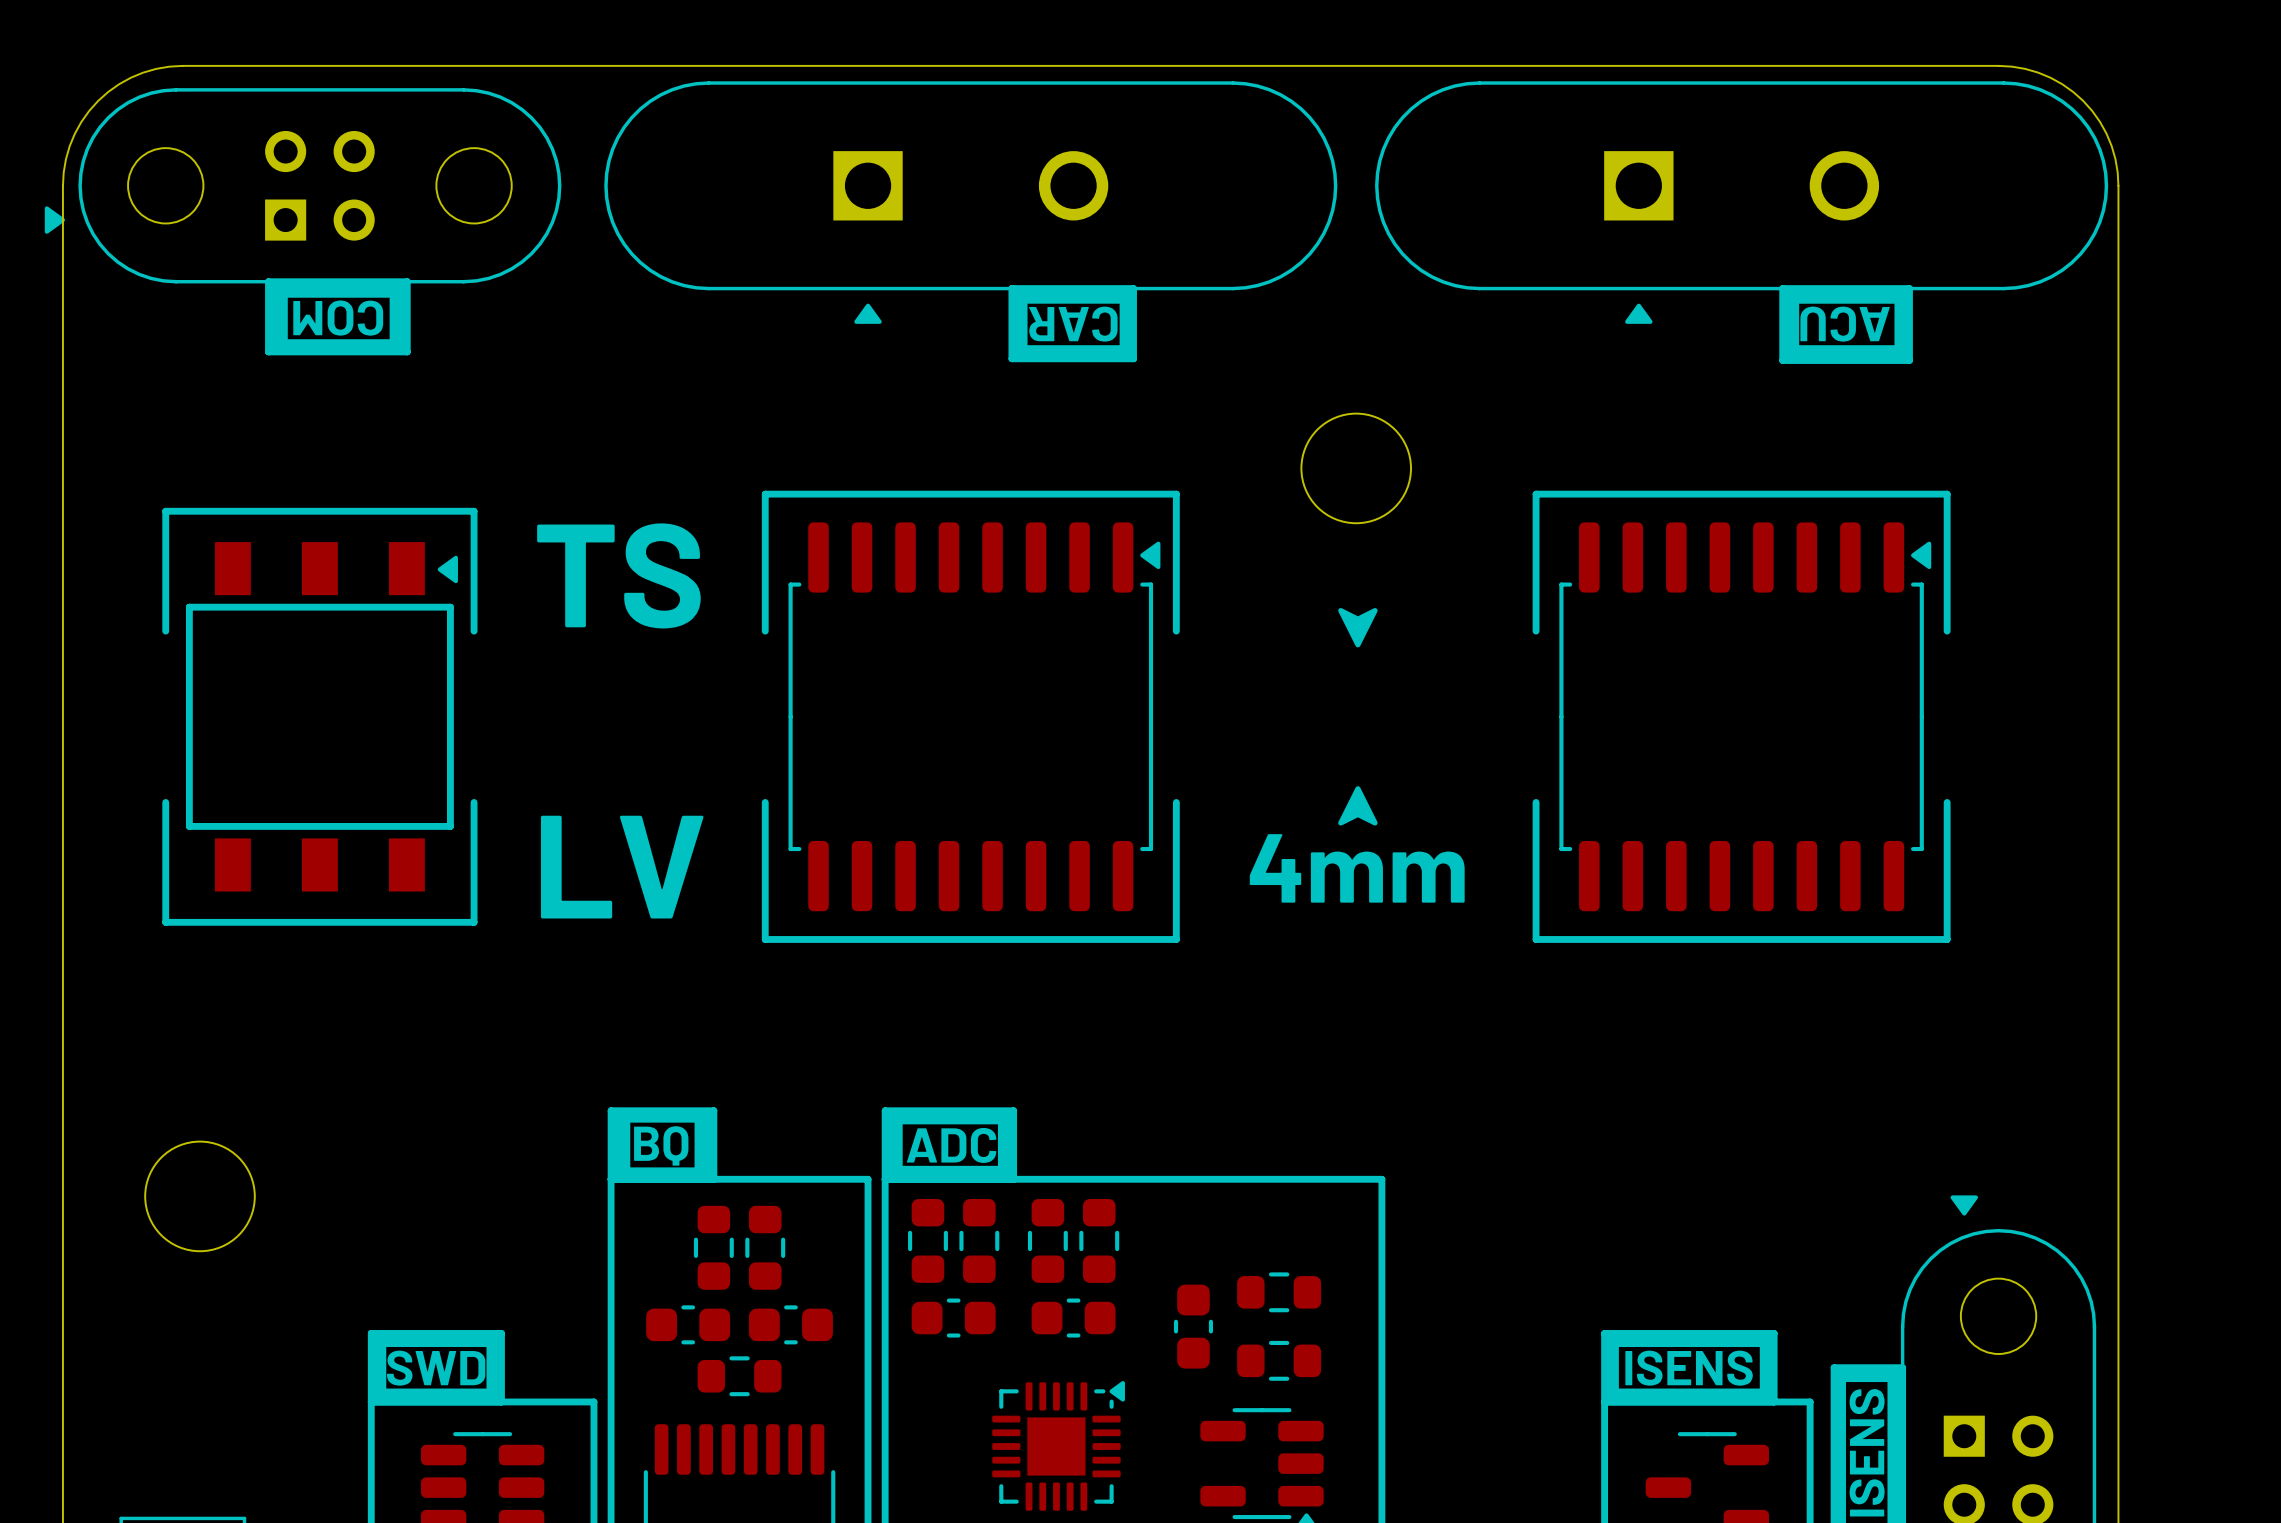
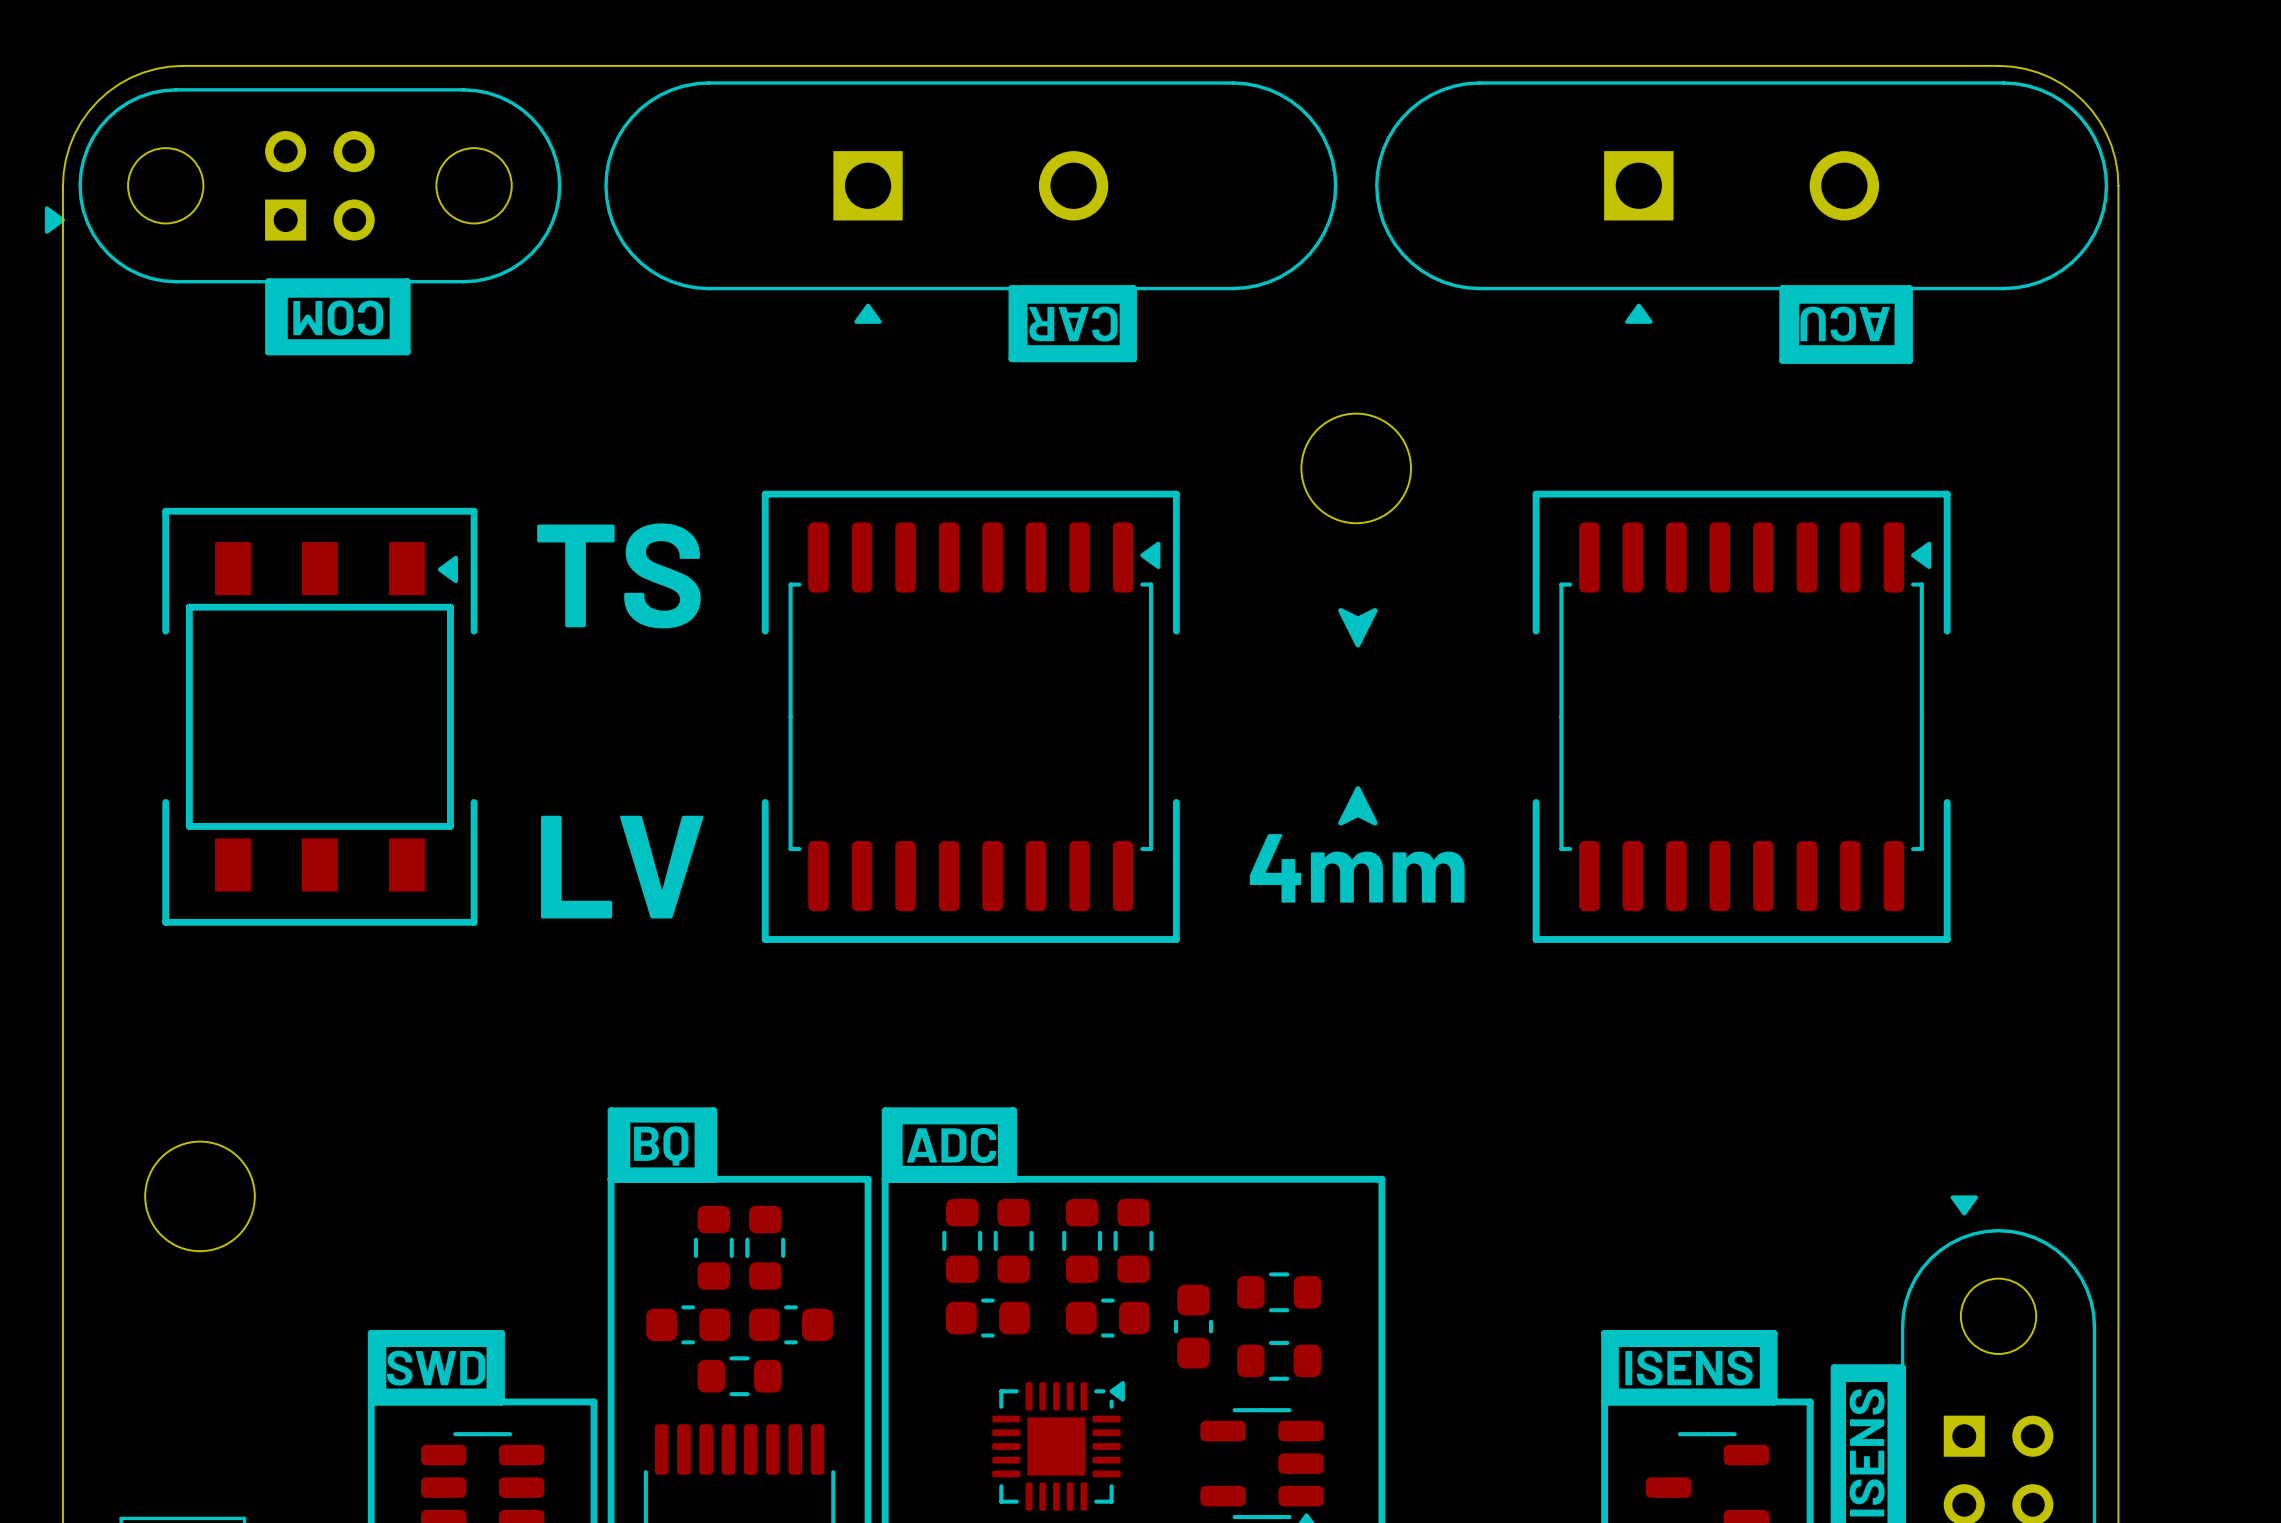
part: (927, 1240) -> none
part: none -> (962, 1240)
part: (979, 1240) -> none
part: none -> (1013, 1240)
part: (1047, 1240) -> none
part: none -> (1082, 1240)
part: (1099, 1240) -> none
part: none -> (1133, 1240)
part position: (953, 1318) -> (987, 1318)
part position: (1073, 1318) -> (1107, 1318)

